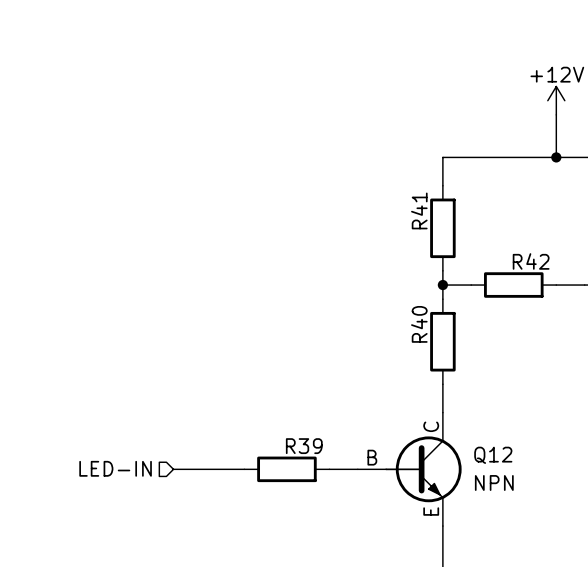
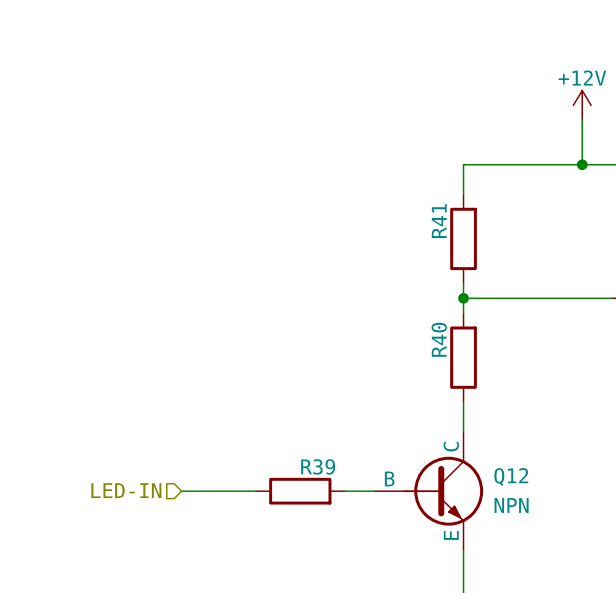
wire: none -> (493, 298) (582, 298)
R42: (513, 285) -> none

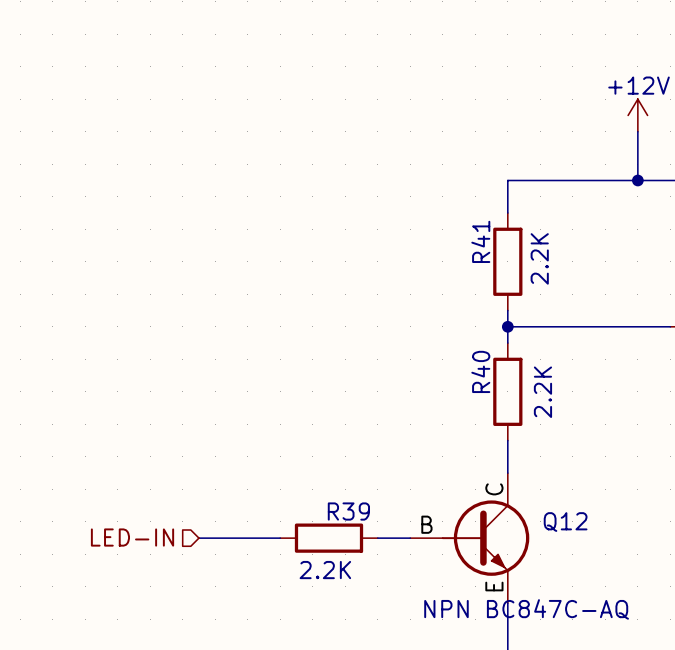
R41 value: none -> 2.2K (539, 258)
R40 value: none -> 2.2K (542, 392)
Q12 value: NPN (511, 505) -> NPN BC847C-AQ (526, 609)
R39 value: none -> 2.2K (325, 570)

